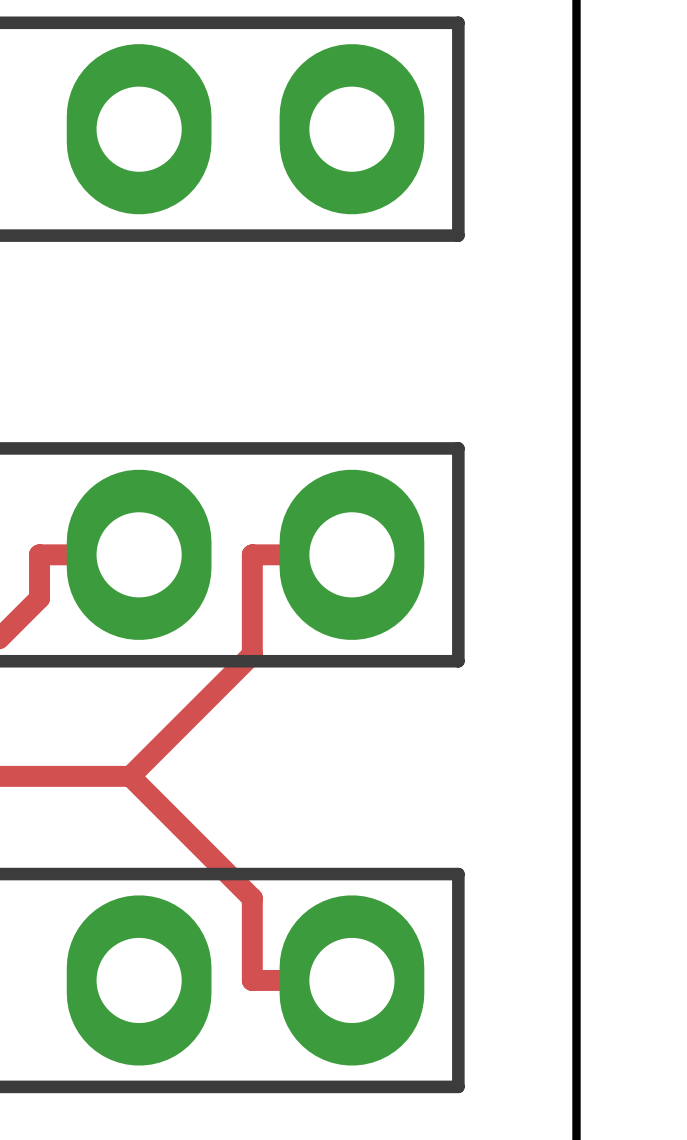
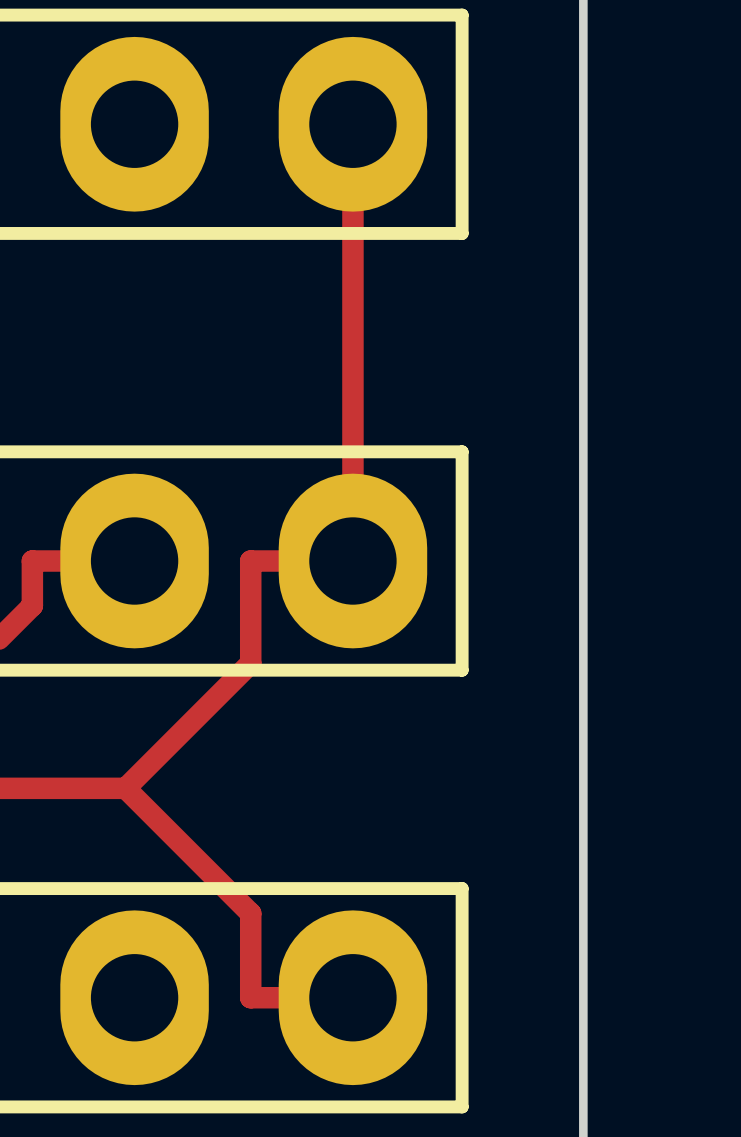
track: none -> (352, 124) (352, 561)

